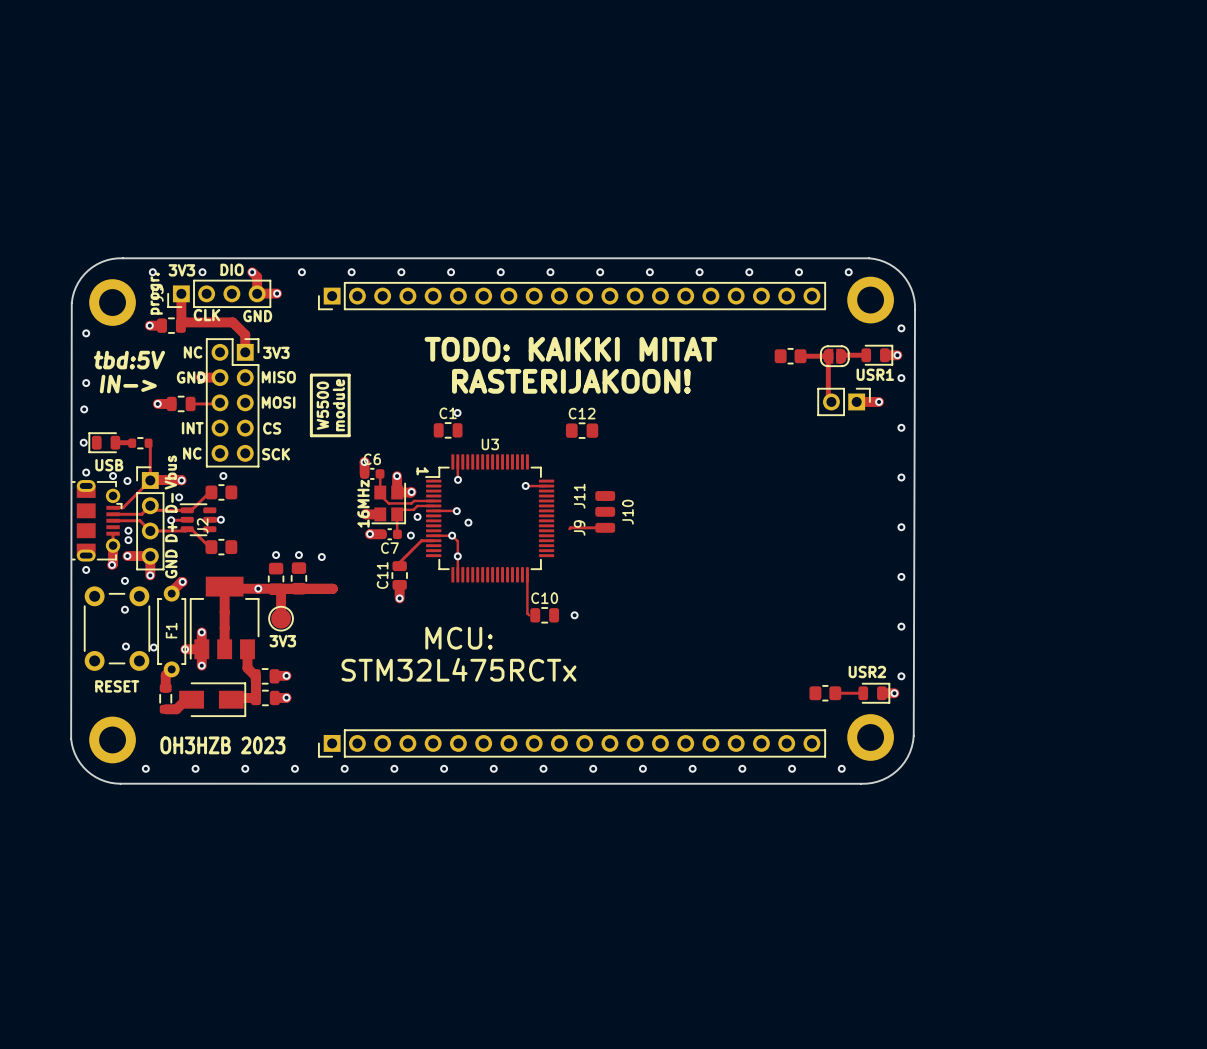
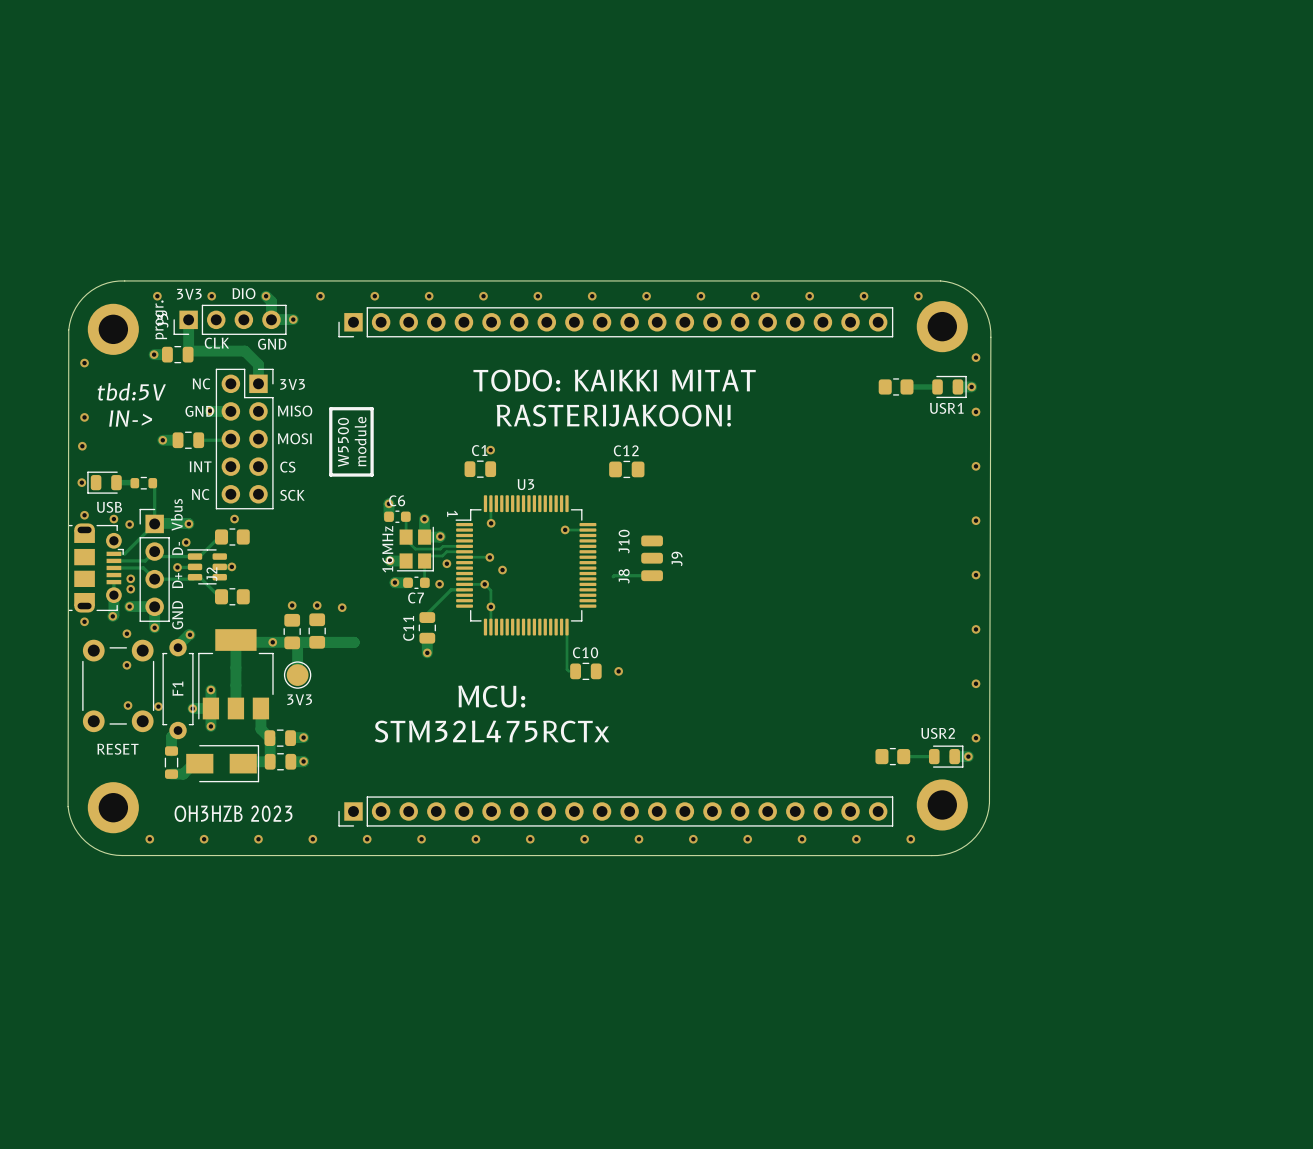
part footprint: [820, 345, 850, 367] -> [878, 378, 914, 396]
part: (790, 356) -> none
track: (800, 356) (828, 356) (828, 398) (831, 401) -> none
part: (844, 401) -> none
track: (856, 401) (879, 401) -> none
via: (879, 401) -> none
J11 name: J11 (579, 496) -> J10 (624, 541)
J10 name: J10 (627, 512) -> J9 (677, 558)
J9 name: J9 (579, 528) -> J8 (624, 576)

